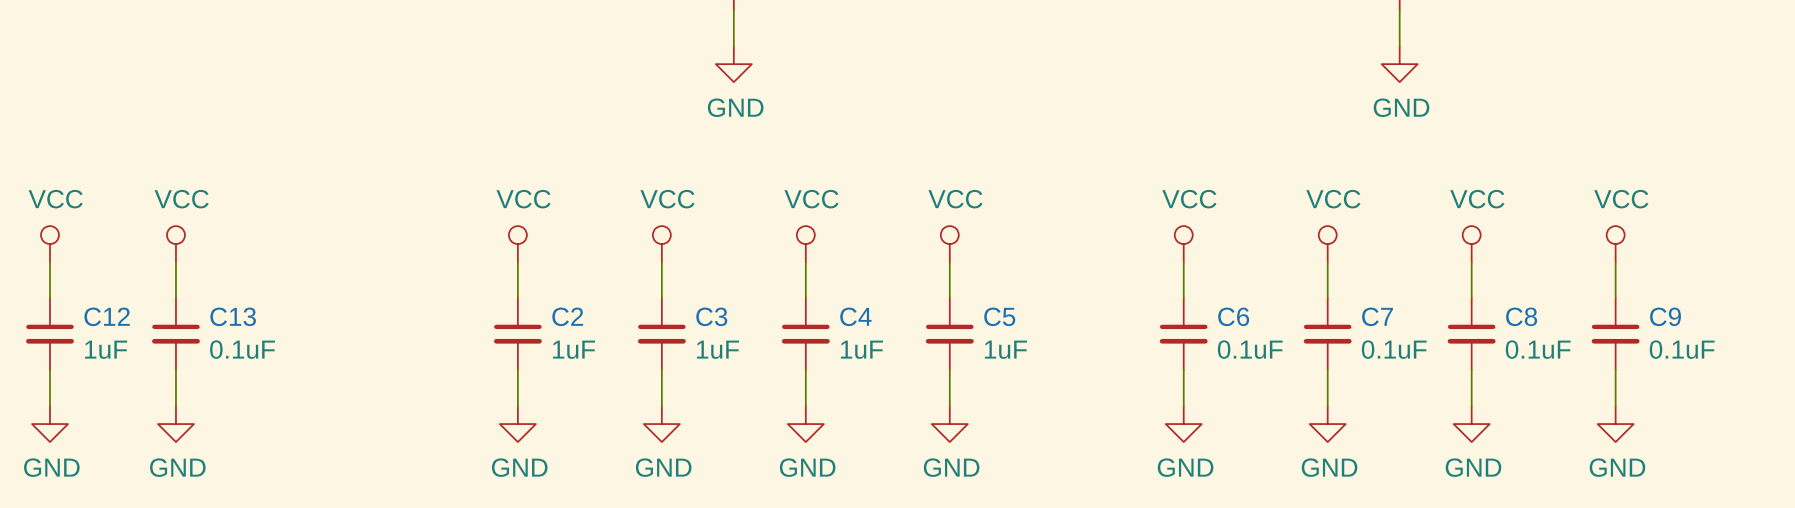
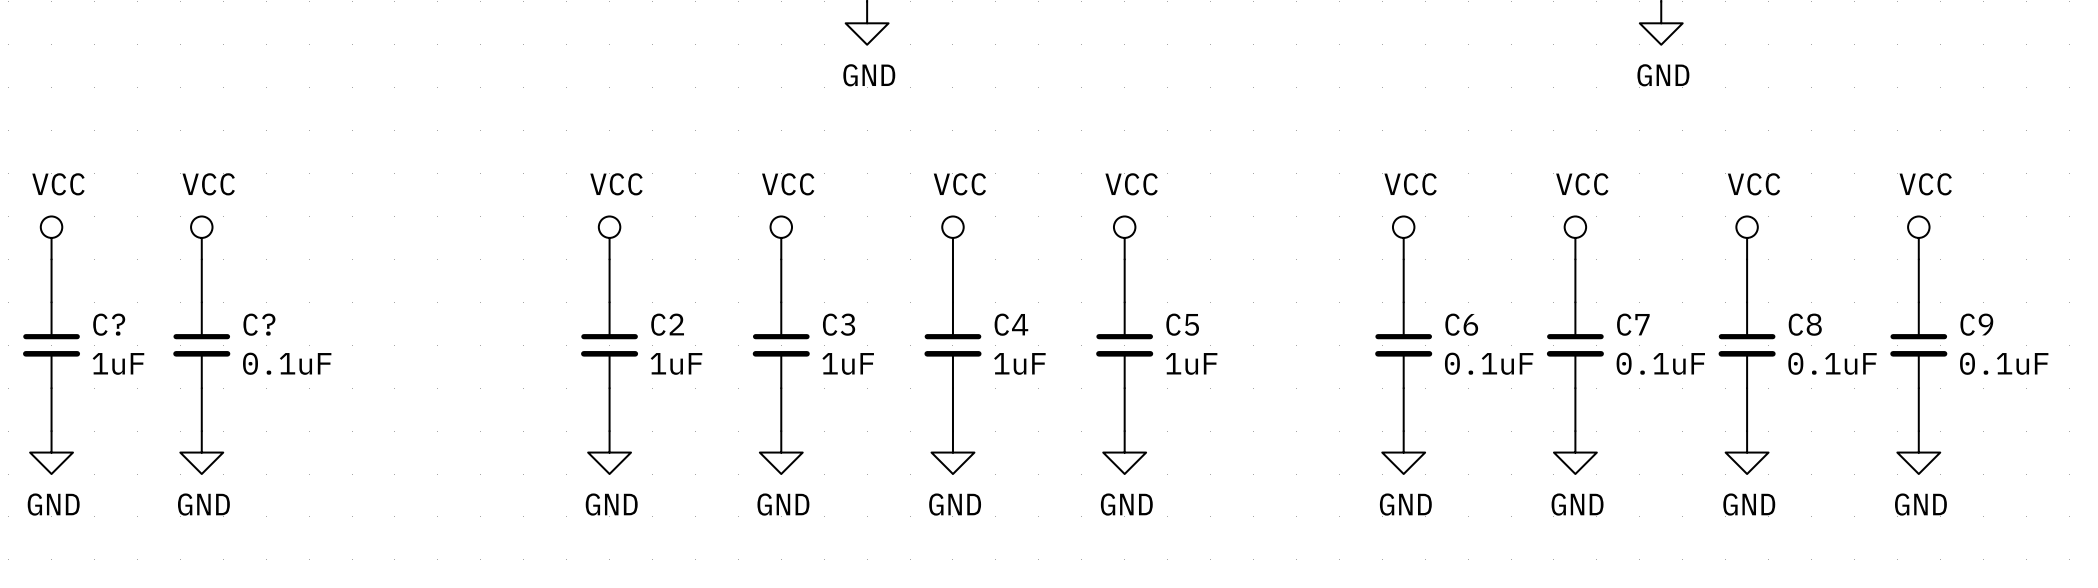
C12 name: C12 (107, 316) -> C? (109, 324)
C13 name: C13 (233, 316) -> C? (259, 324)

